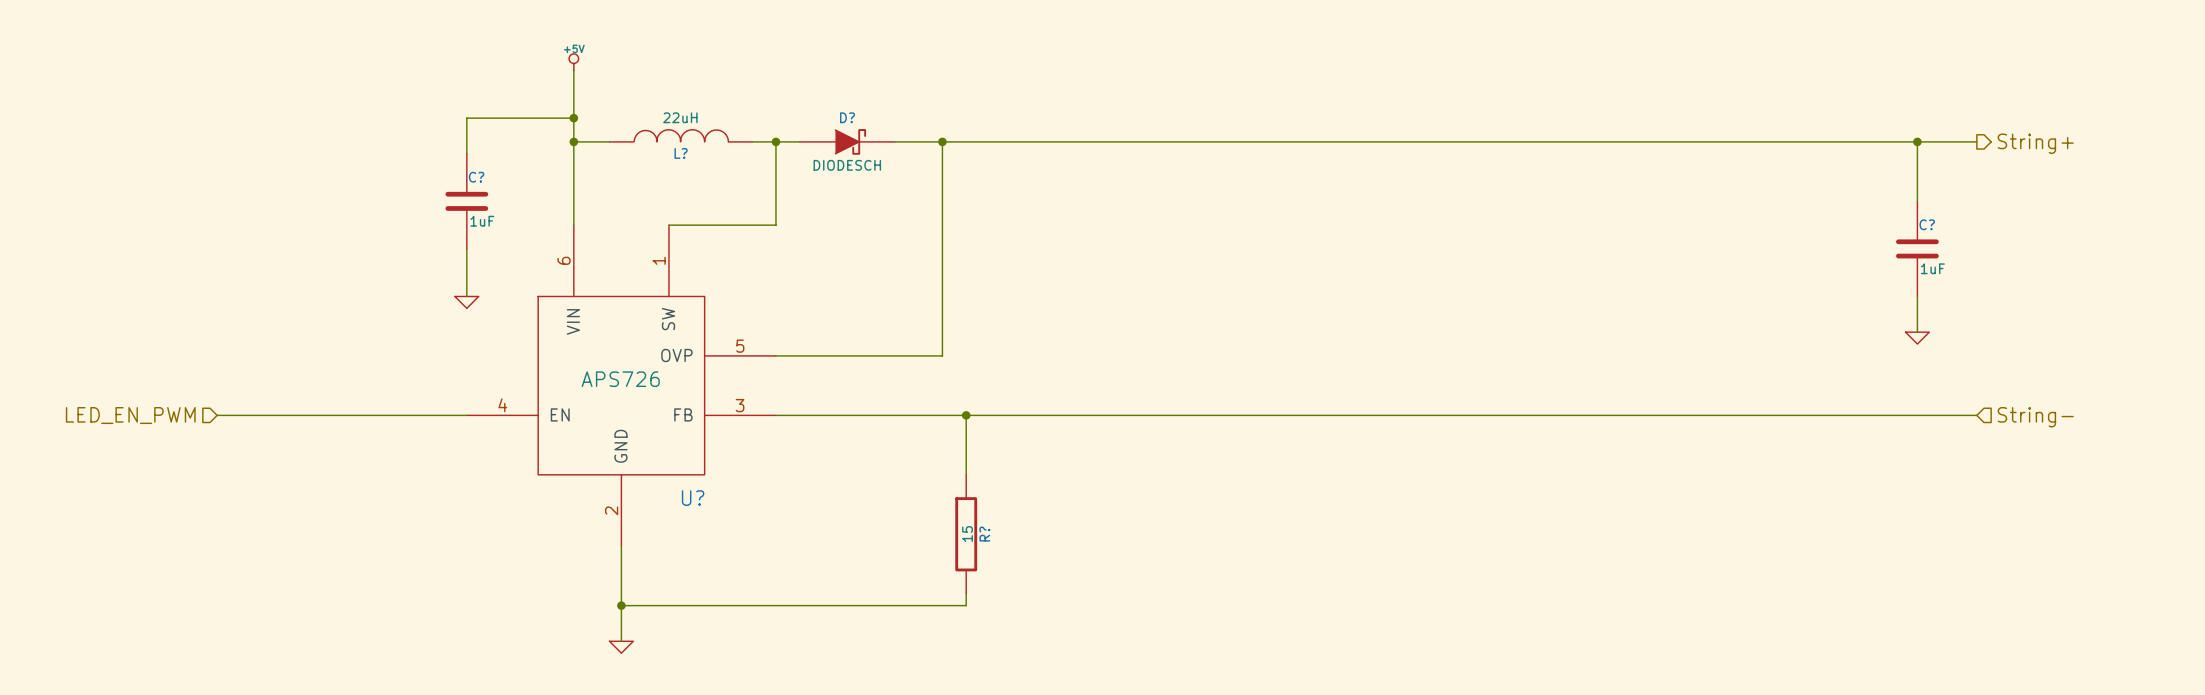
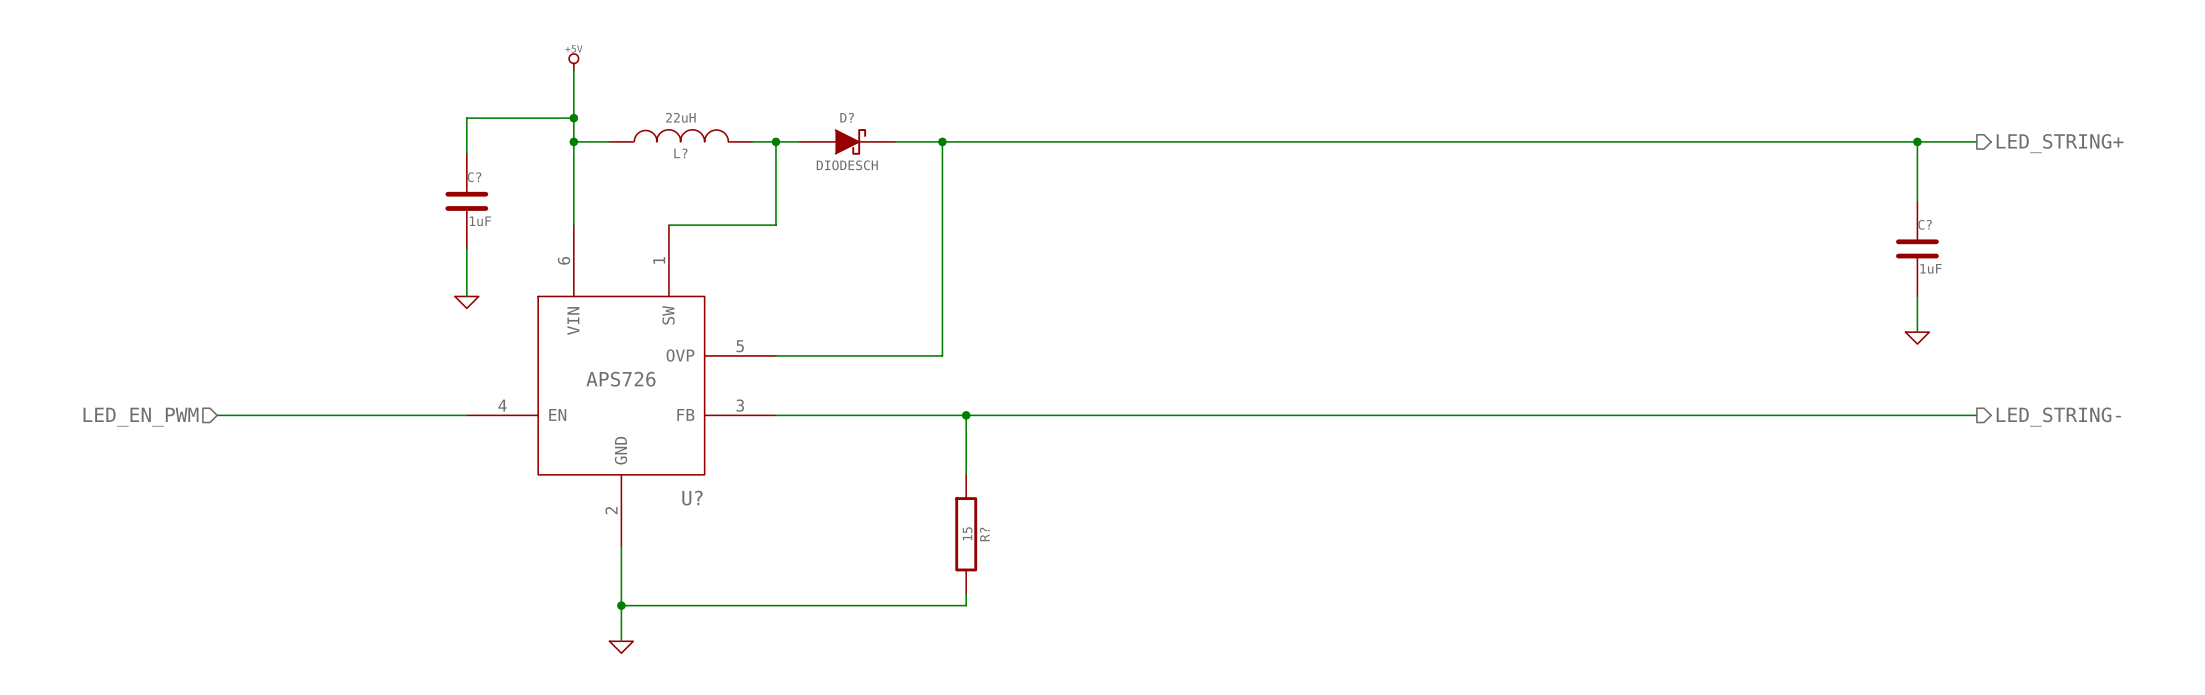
hierarchical label: String+ (2035, 143) -> LED_STRING+ (2060, 143)
hierarchical label shape: input (2035, 417) -> output (2058, 417)
hierarchical label: String- (2035, 417) -> LED_STRING- (2058, 417)

